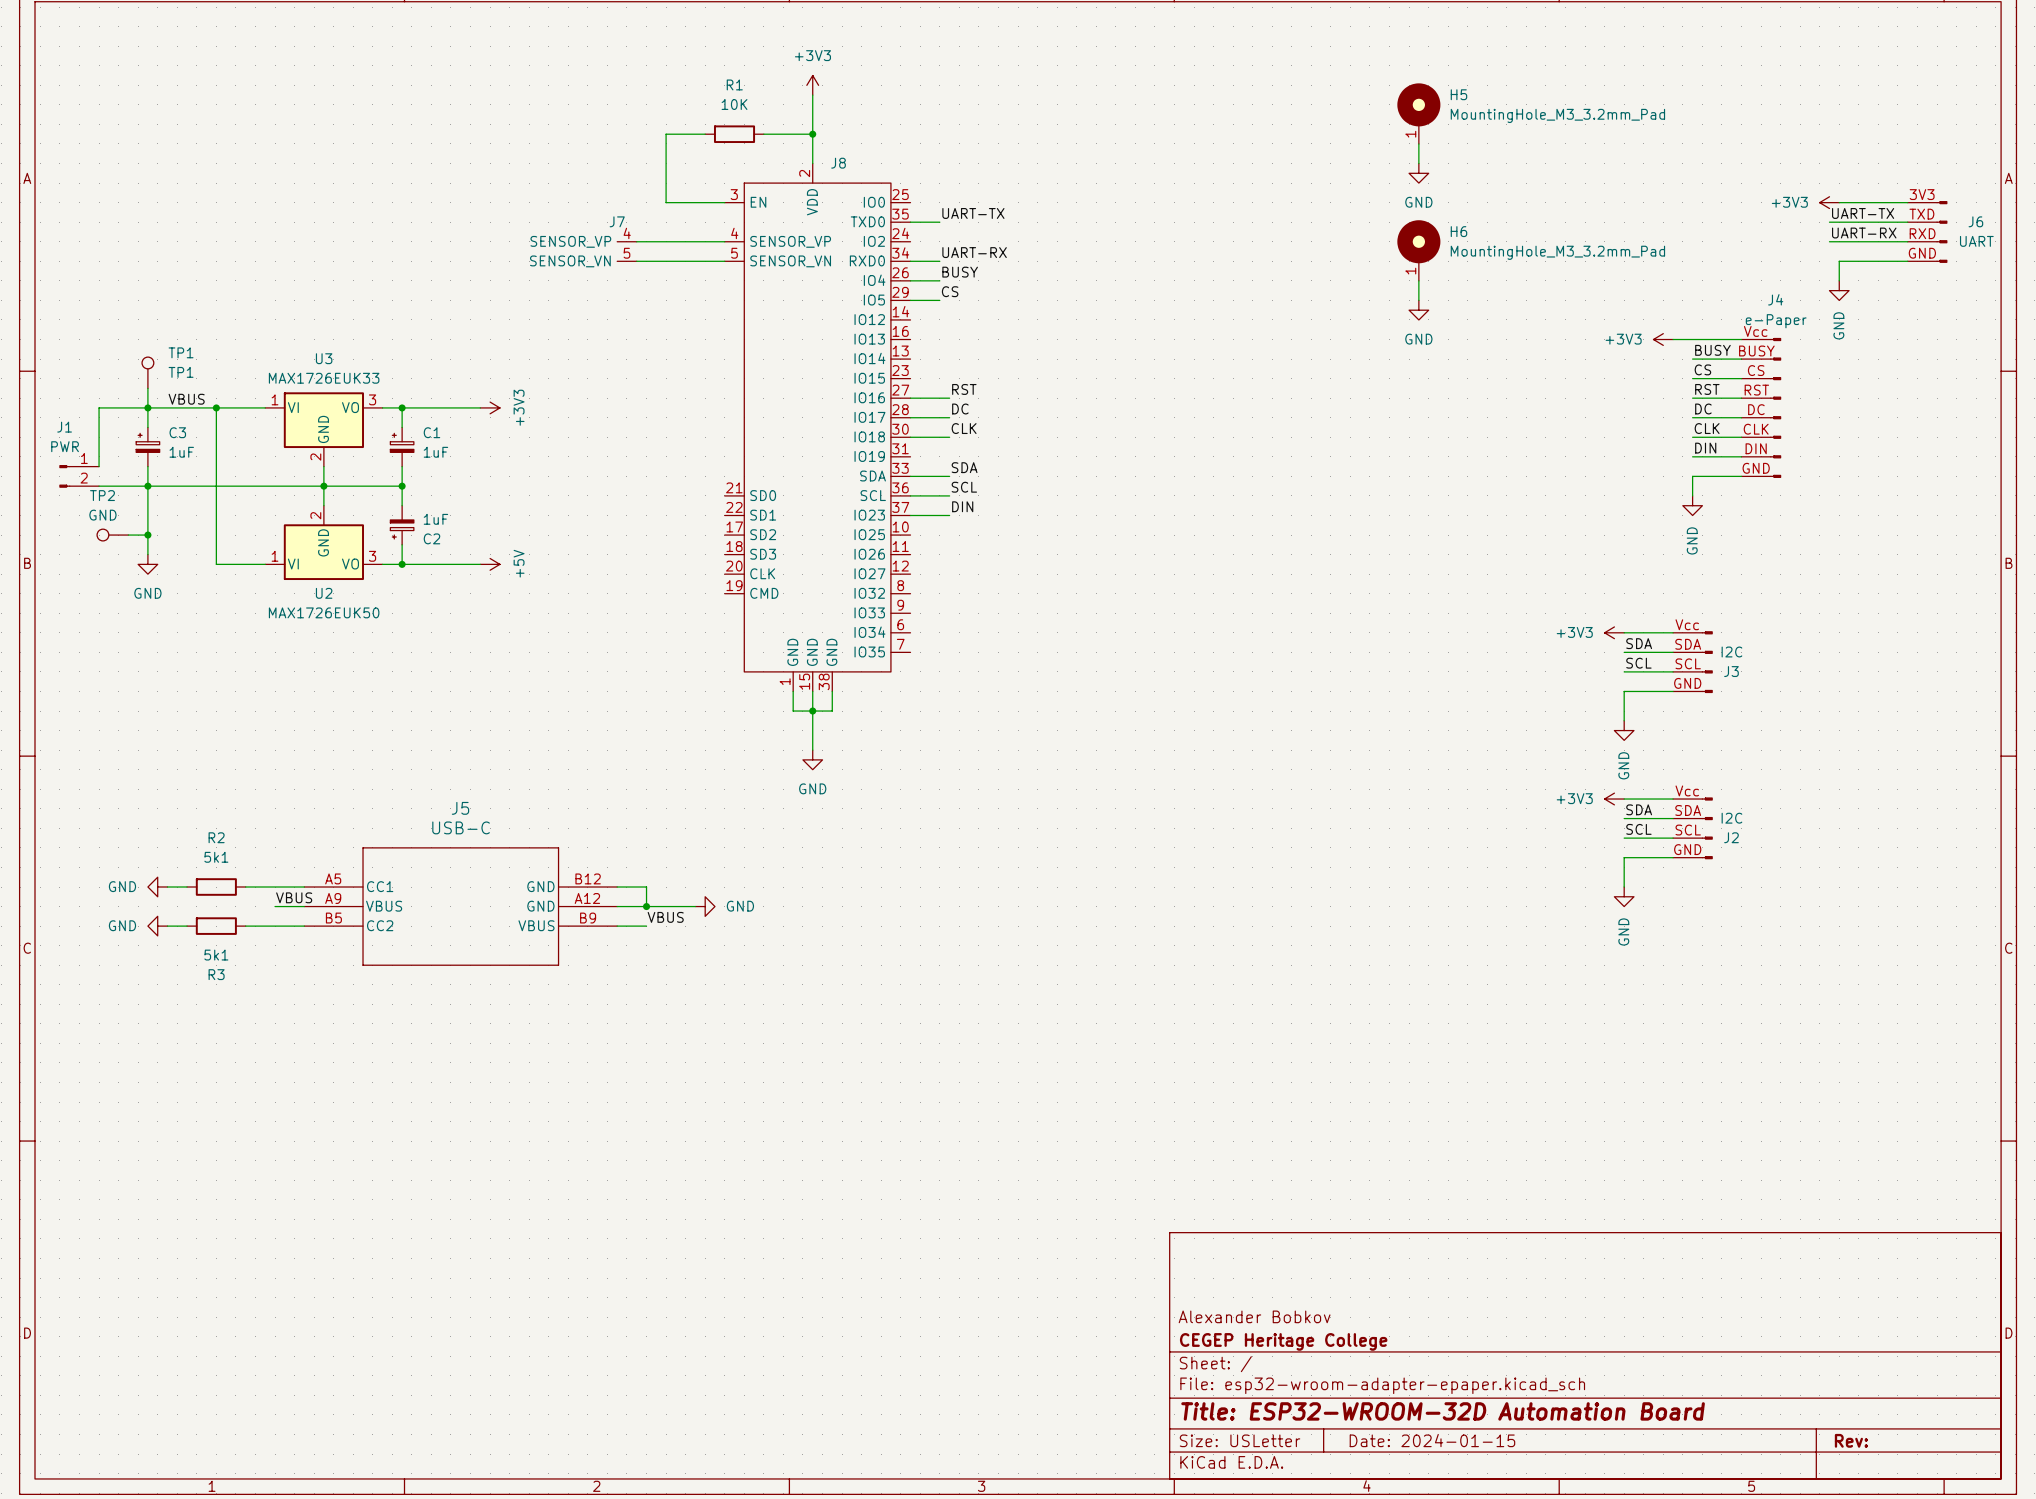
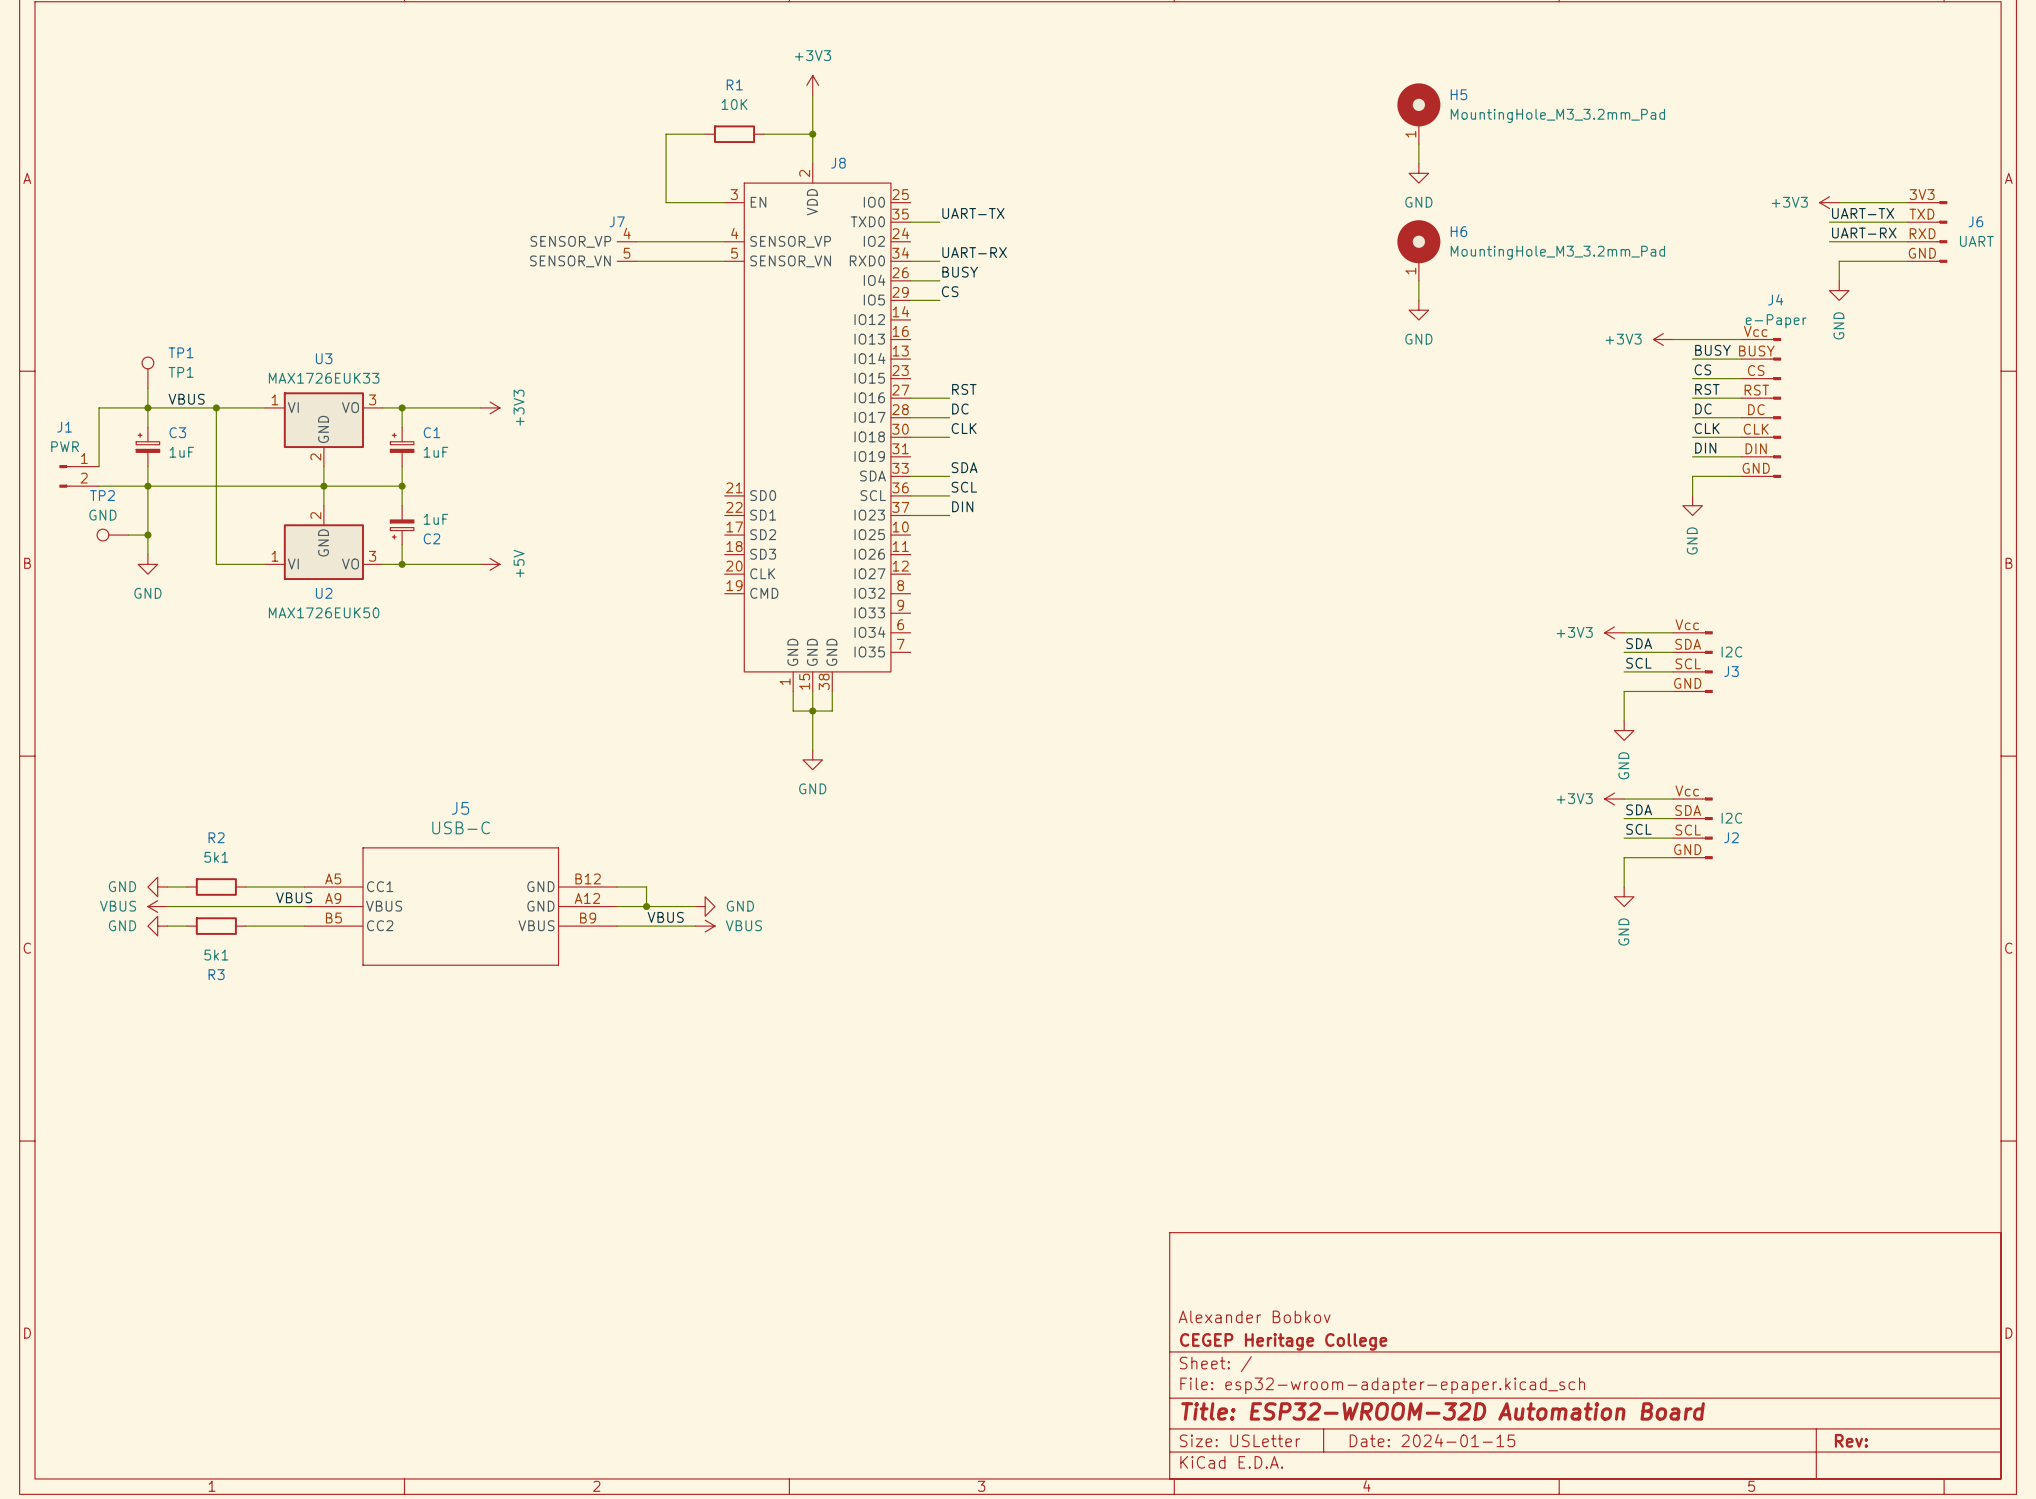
power symbol: none -> VBUS (157, 906)
wire: none -> (167, 906) (275, 906)
wire: none -> (646, 926) (695, 926)
power symbol: none -> VBUS (705, 926)

